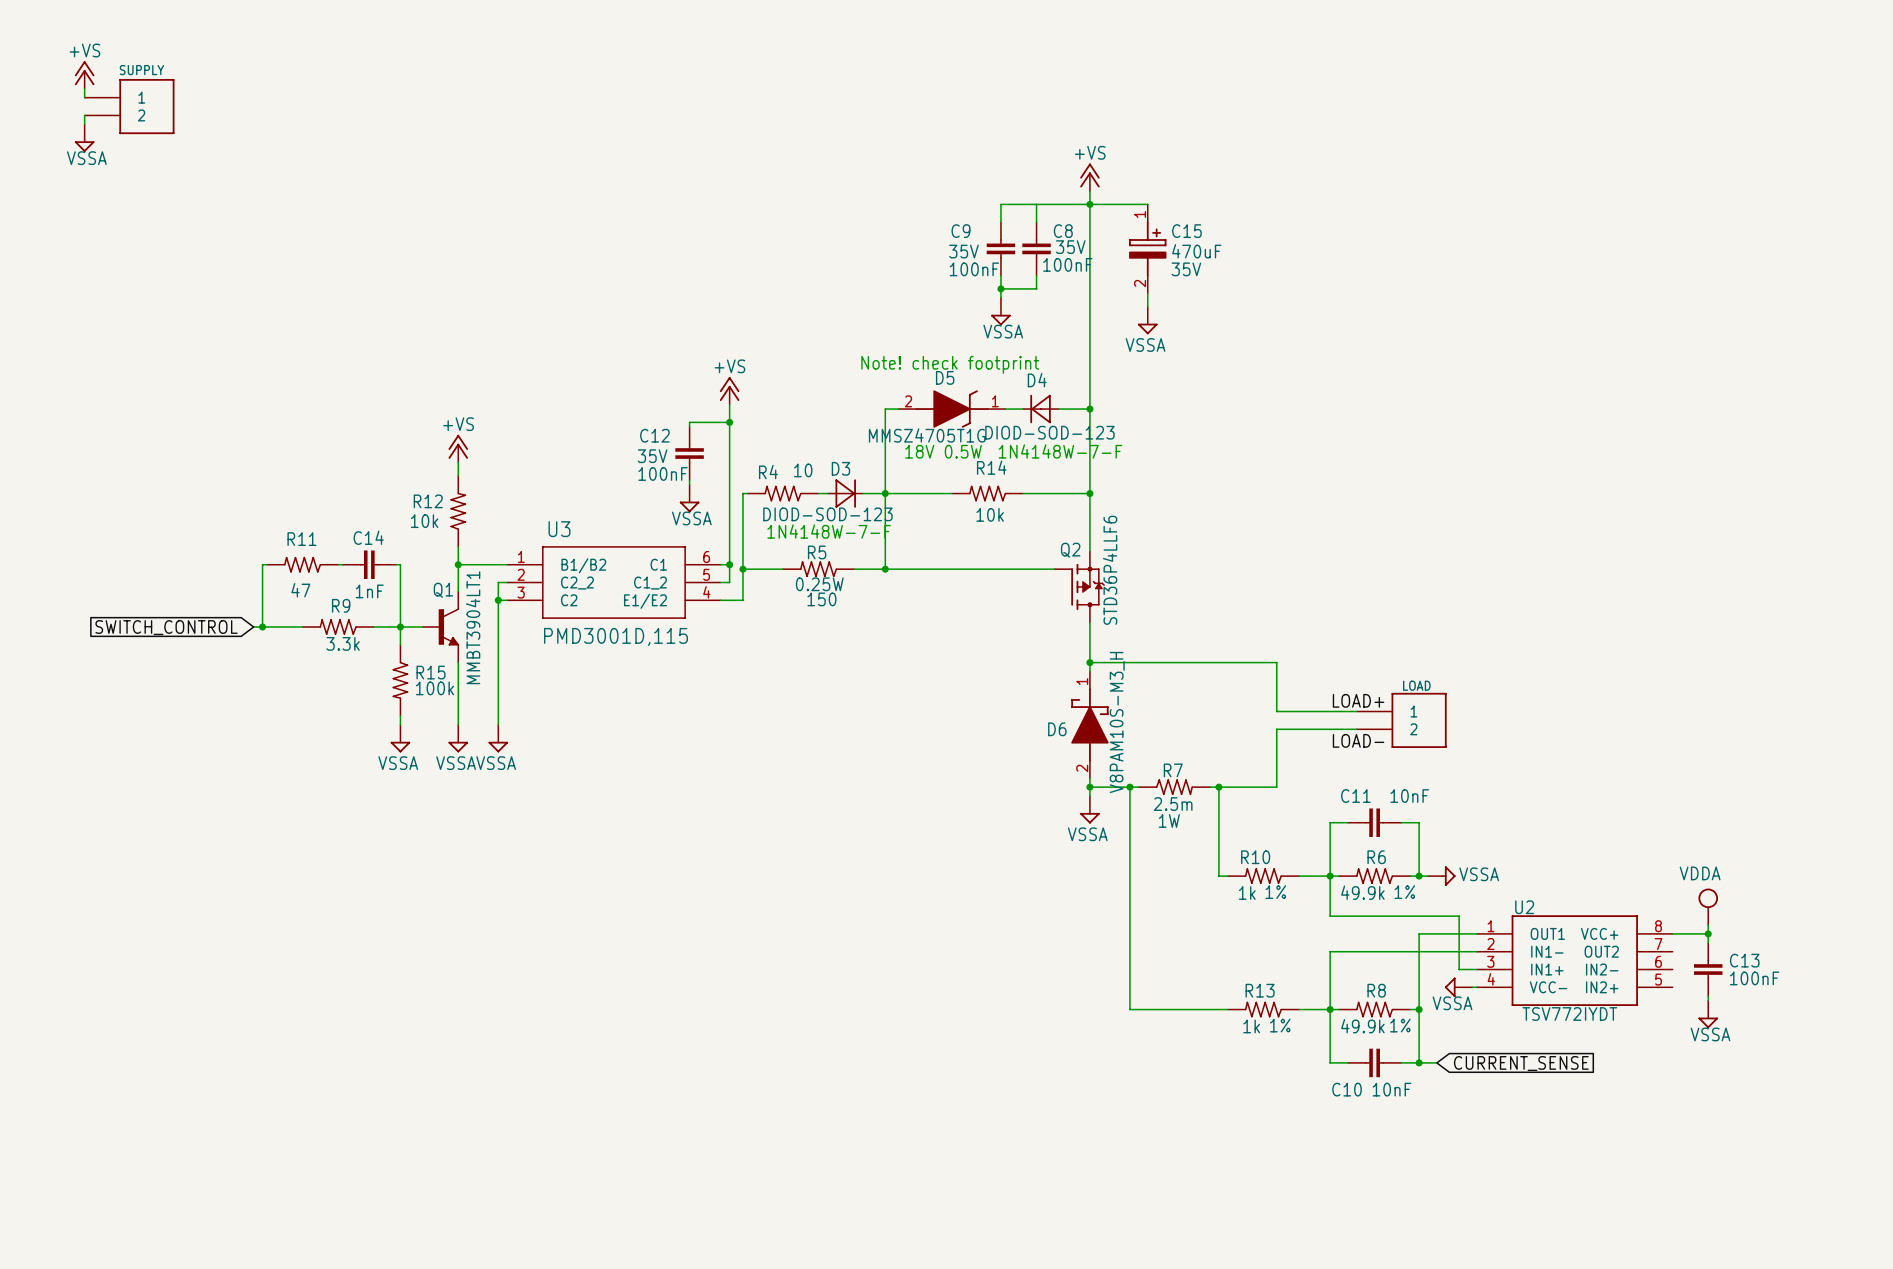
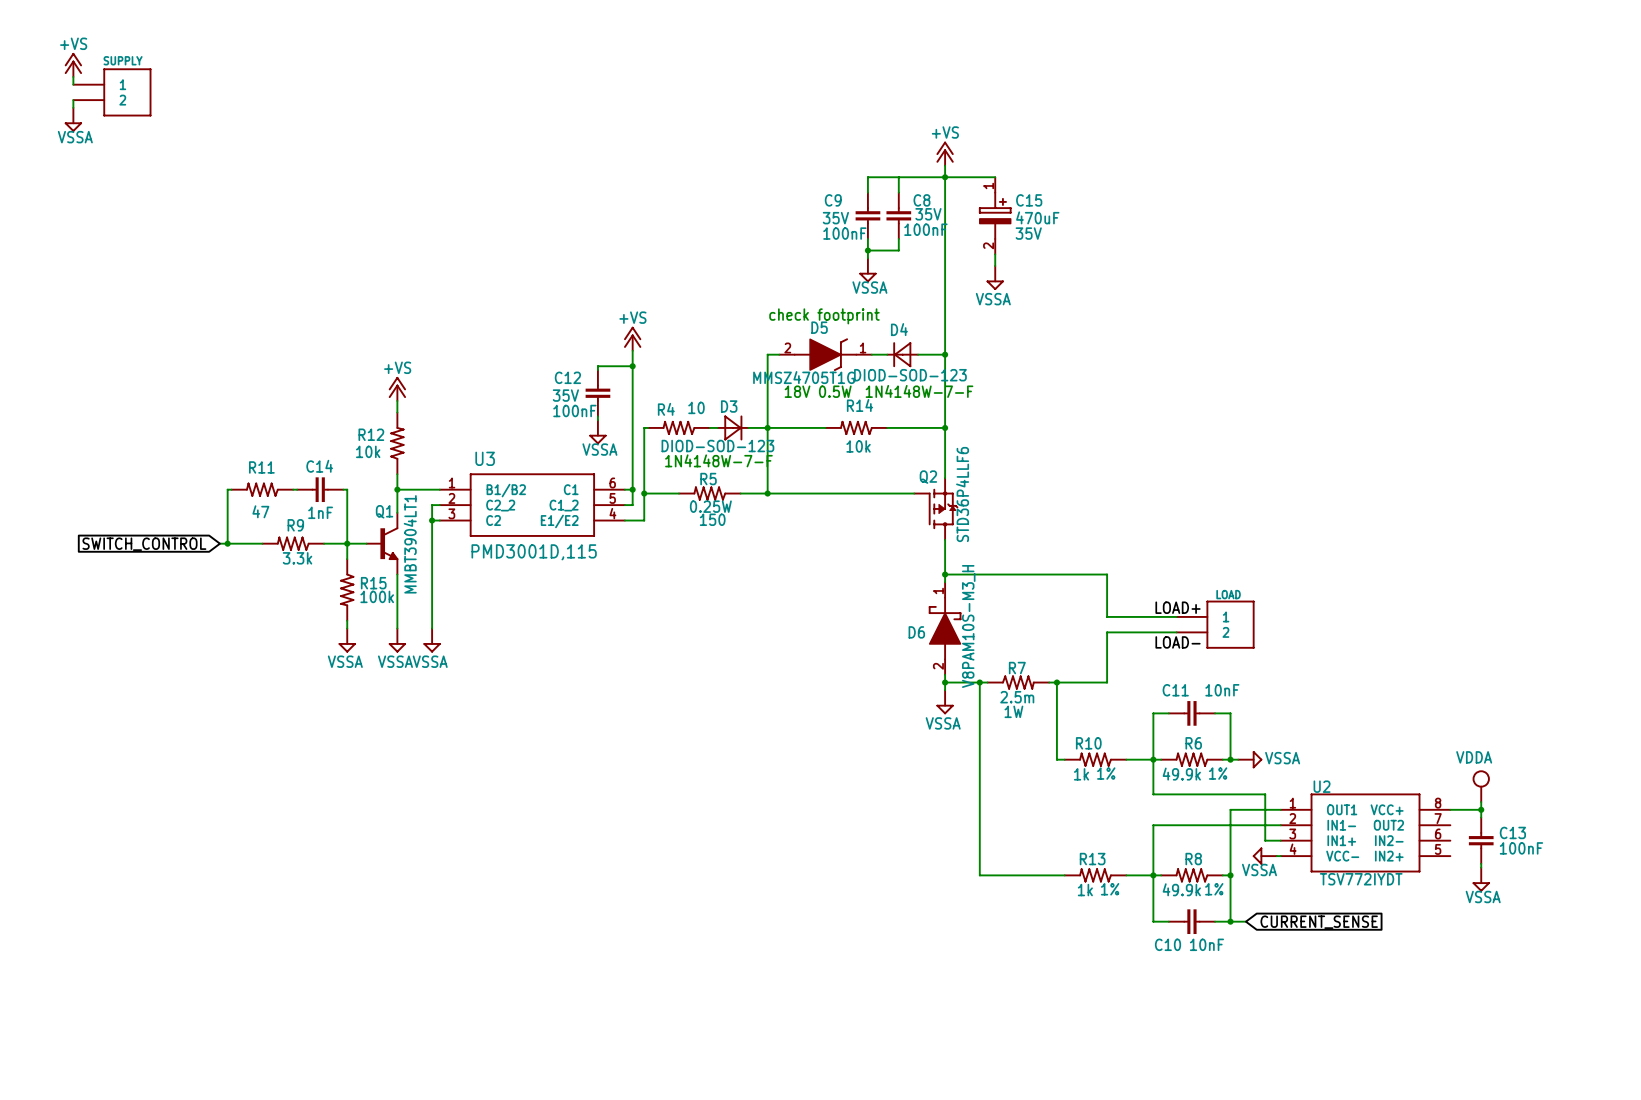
text: Note! check footprint (950, 364) -> check footprint (824, 316)

